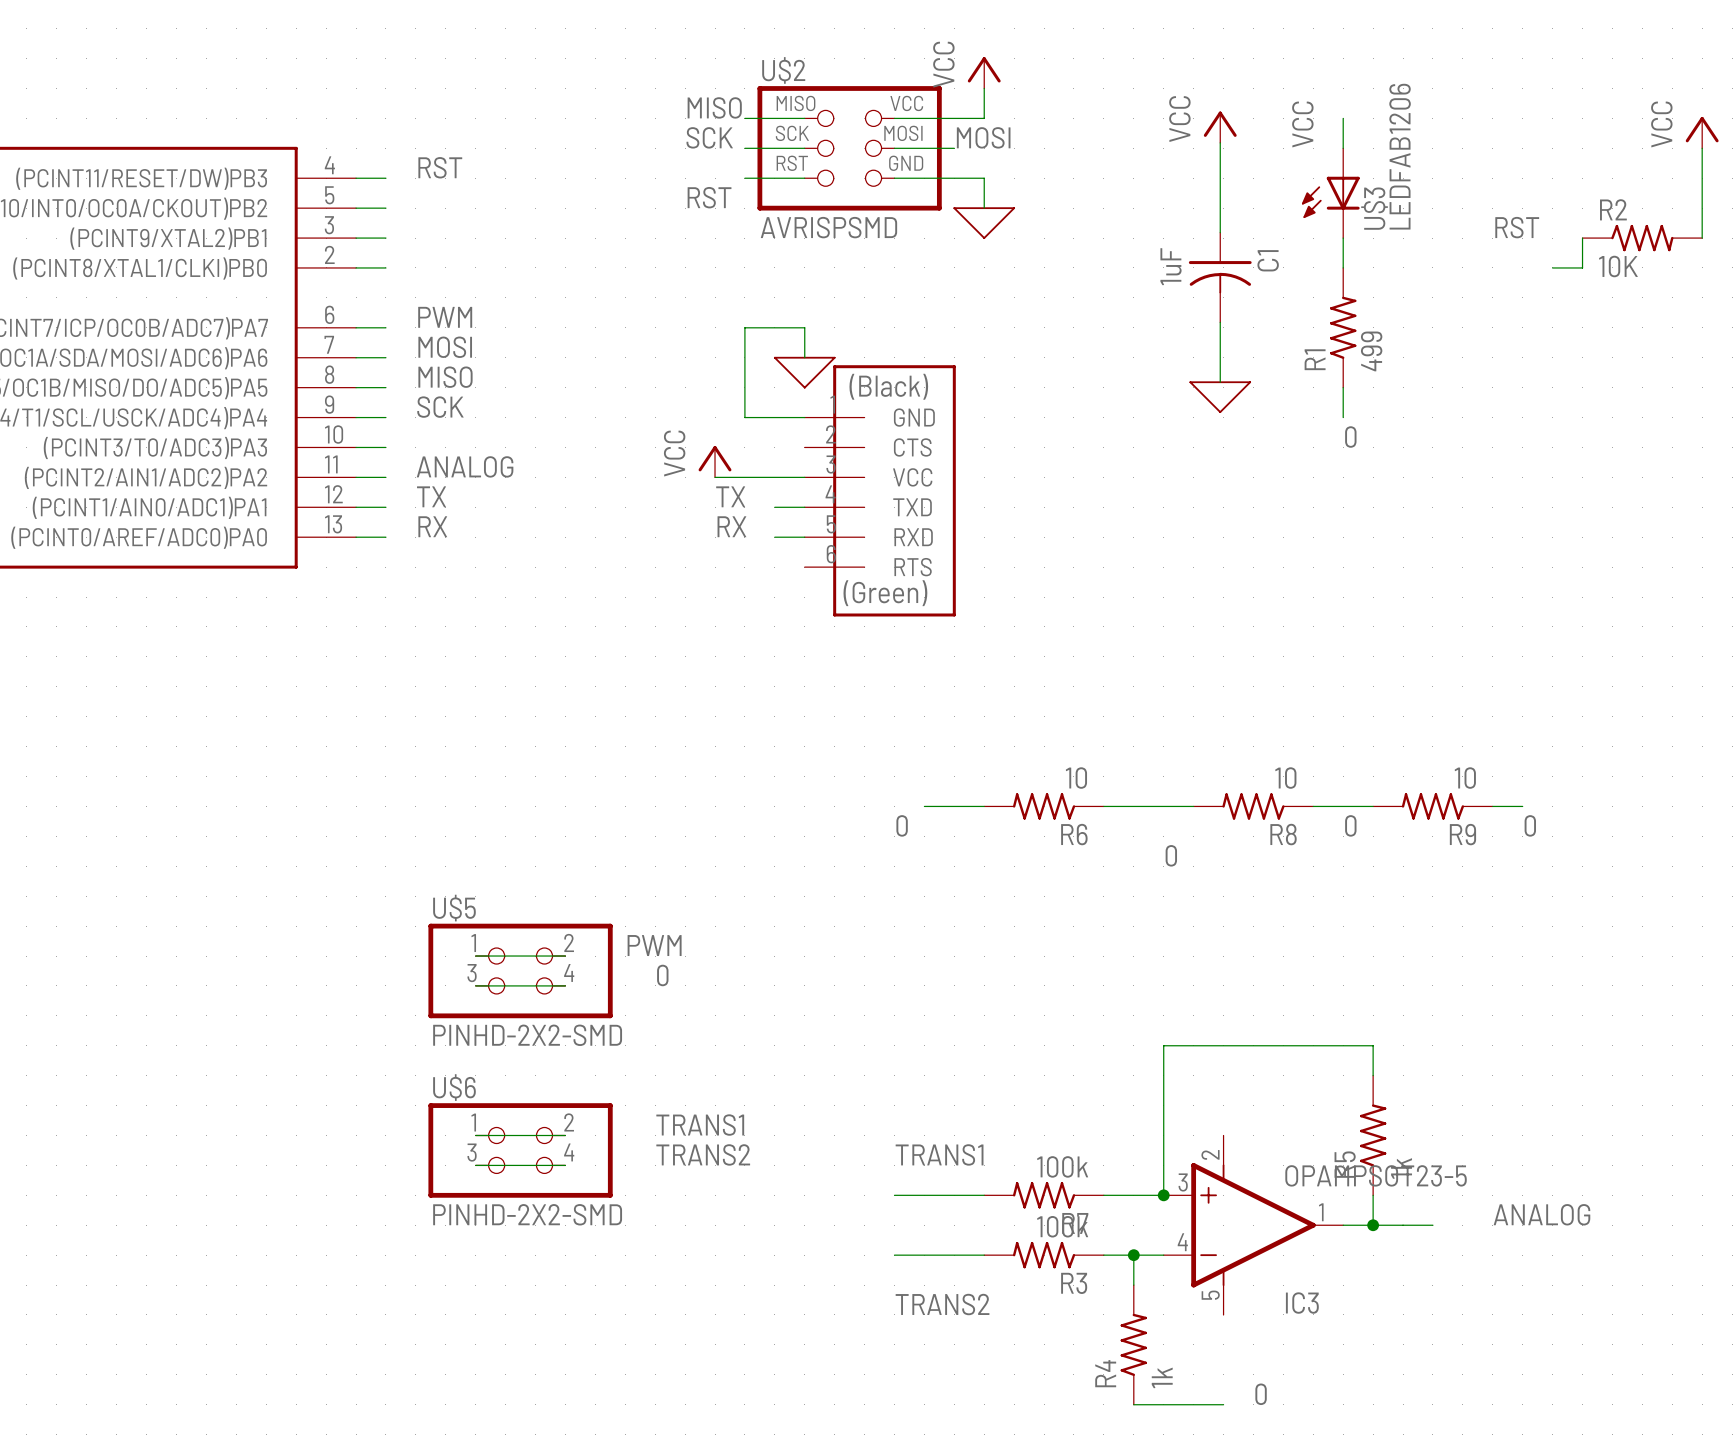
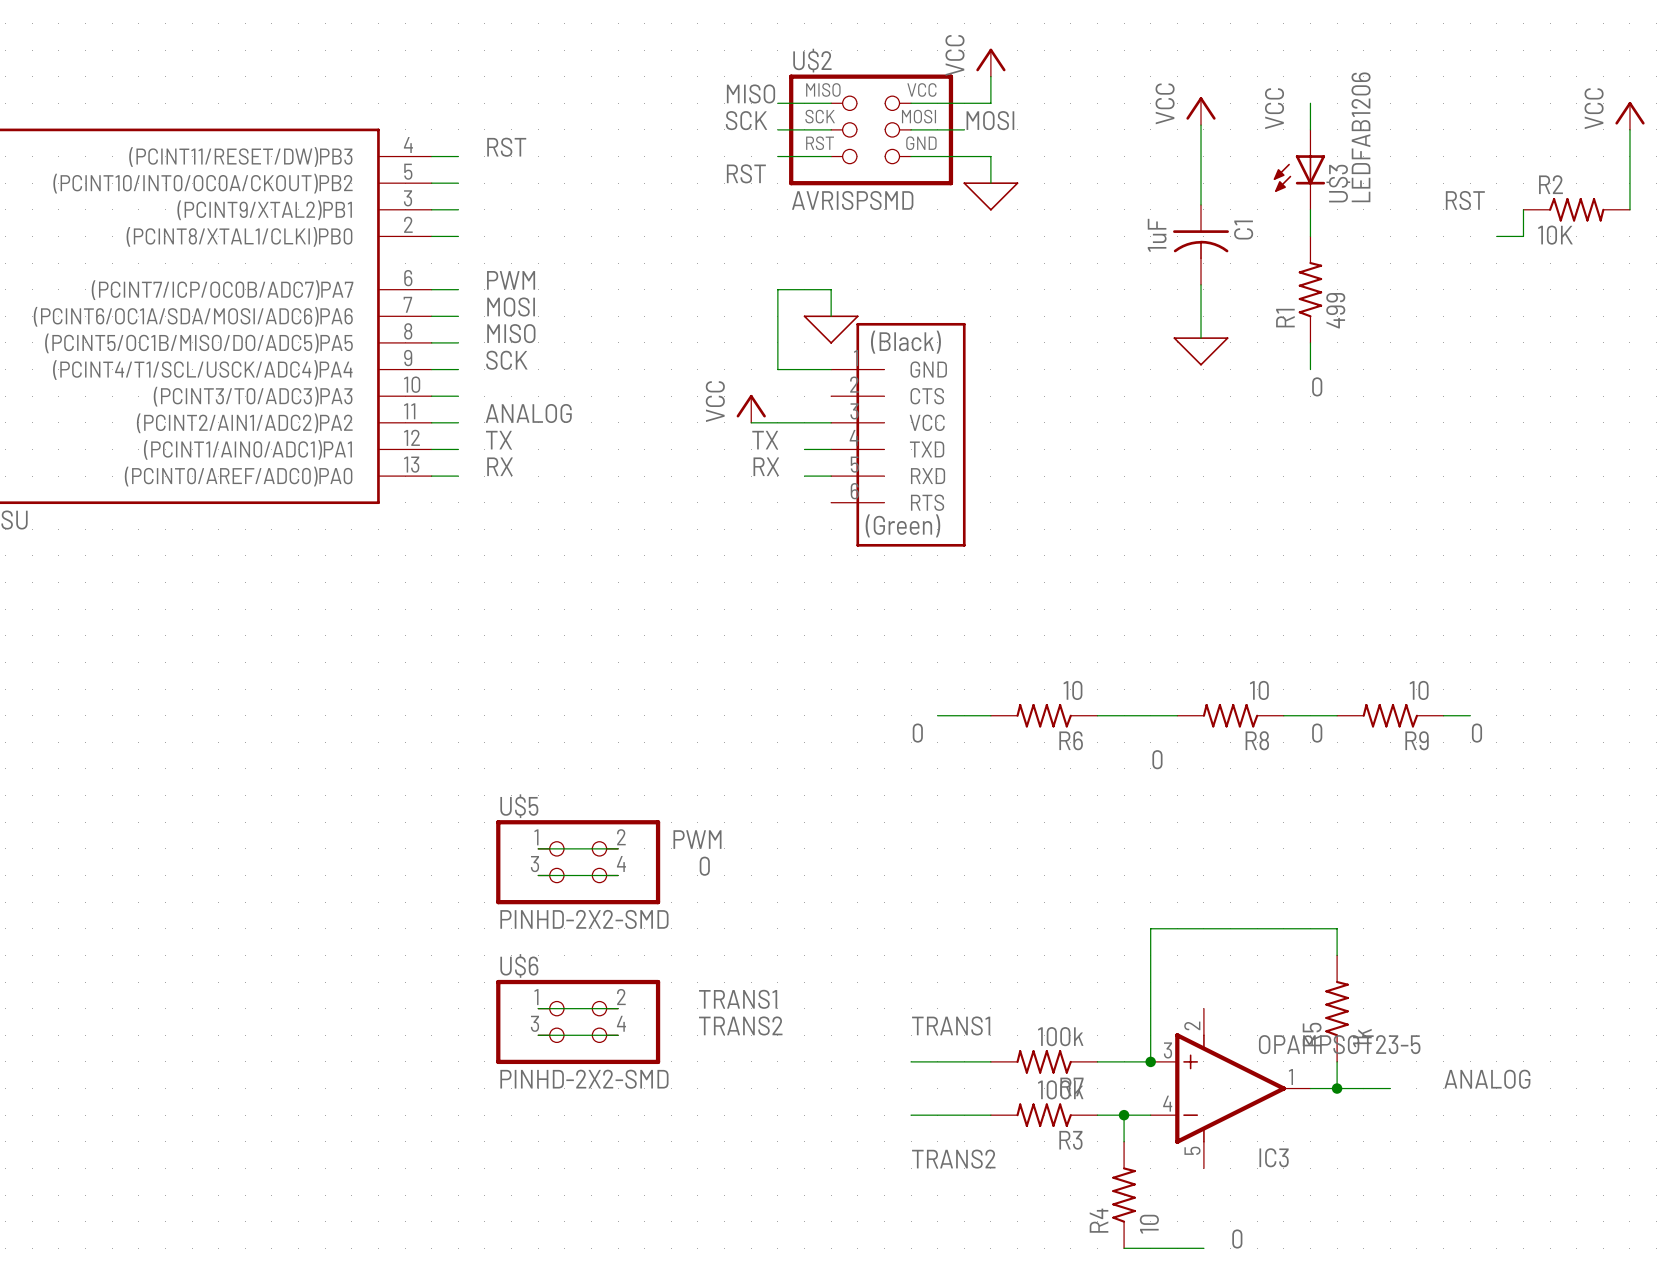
R4 value: 1k (1162, 1377) -> 10 (1149, 1224)

